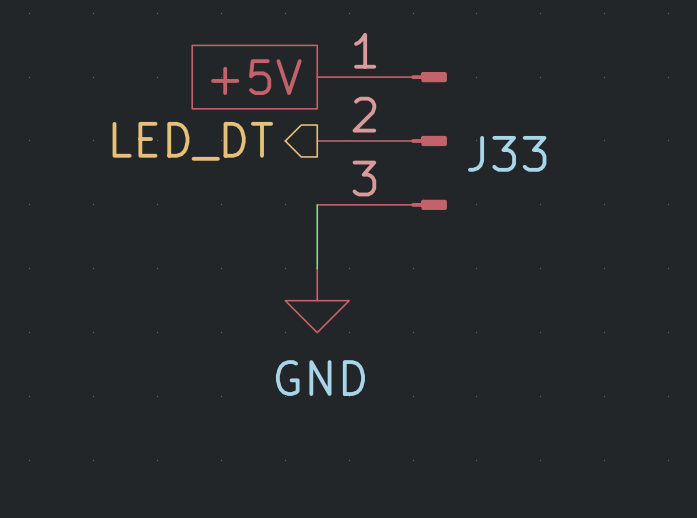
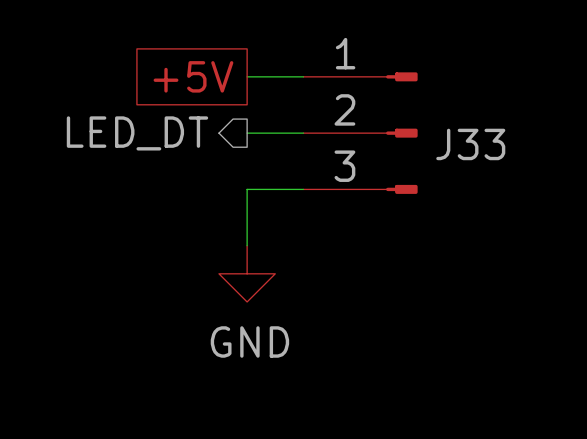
J33 position: (382, 140) -> (360, 133)

